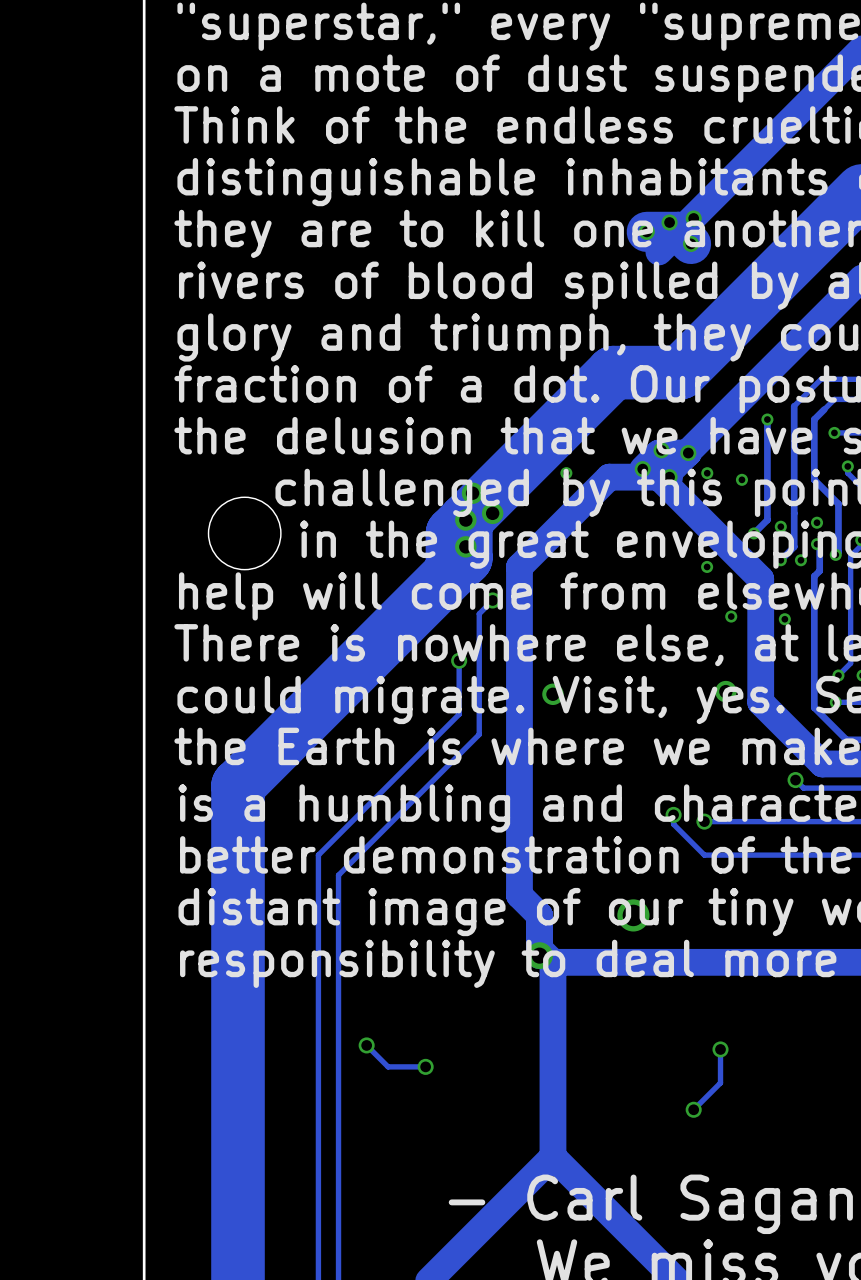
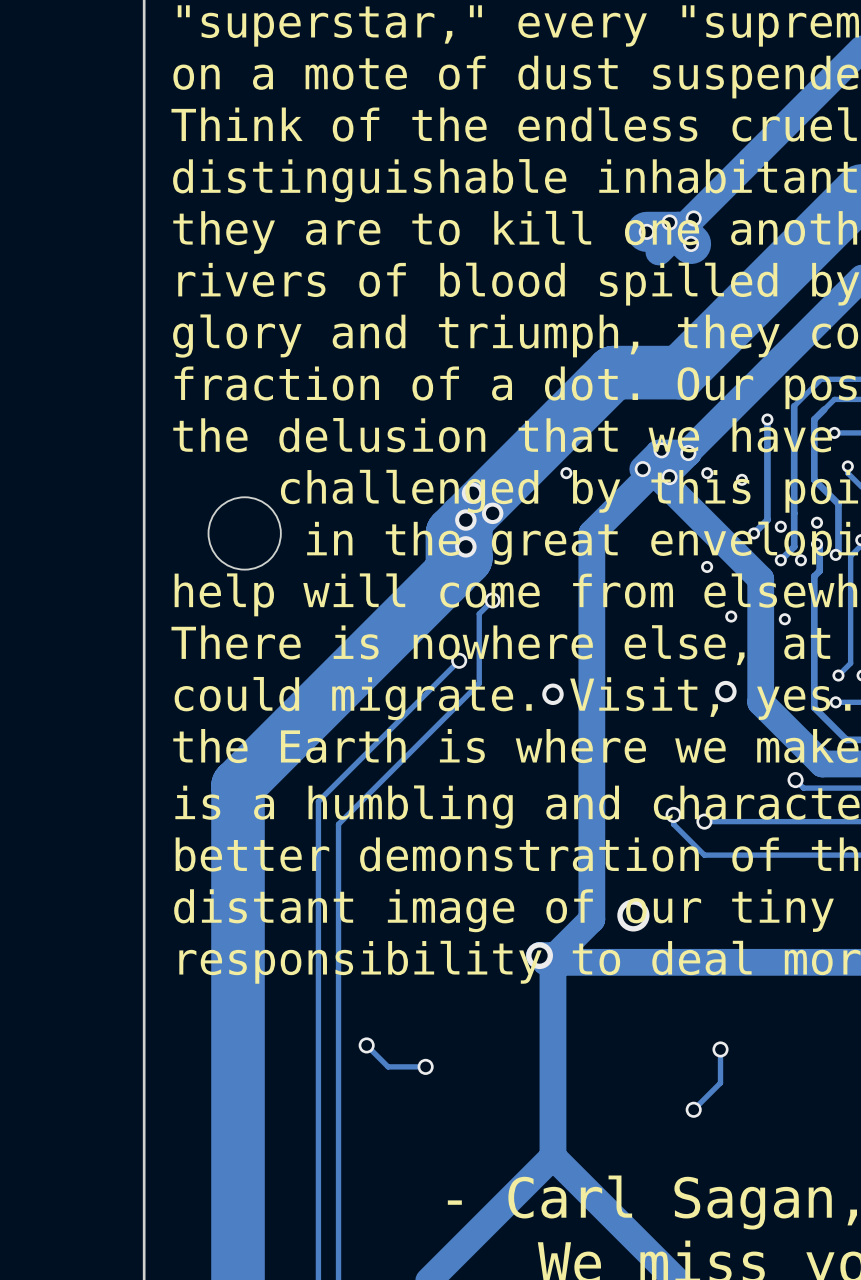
track: (648, 477) (609, 477) (519, 566) (519, 895) (539, 915) (539, 955) -> (648, 477) (591, 533) (591, 919) (555, 955) (539, 955) (546, 962) (552, 962)
track: (459, 660) (459, 714) (318, 855) -> (459, 660) (318, 801) (318, 855)
track: (479, 683) (479, 734) (338, 875) -> (479, 683) (338, 824) (338, 875)

